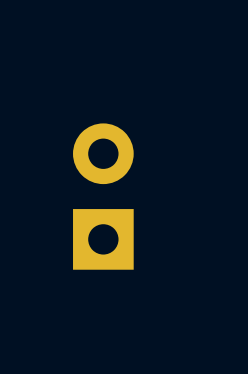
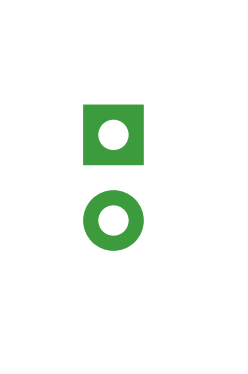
part rotation: 0° (103, 196) -> 180° (113, 177)

